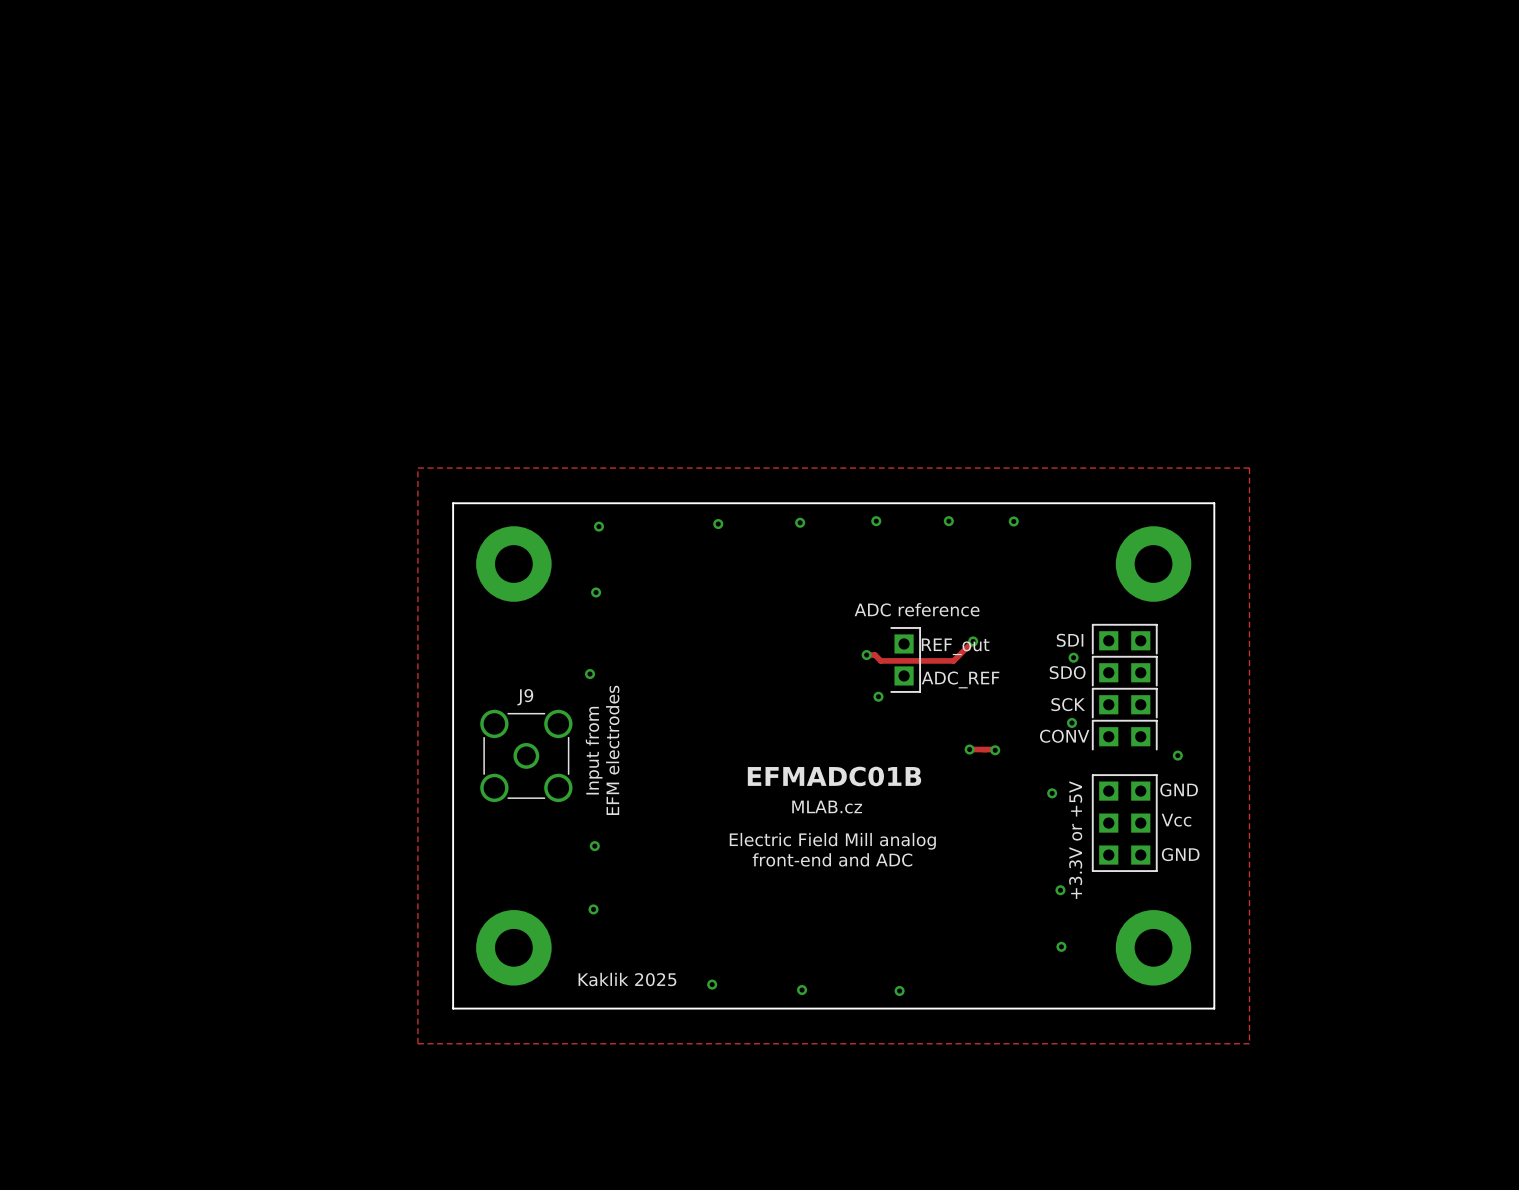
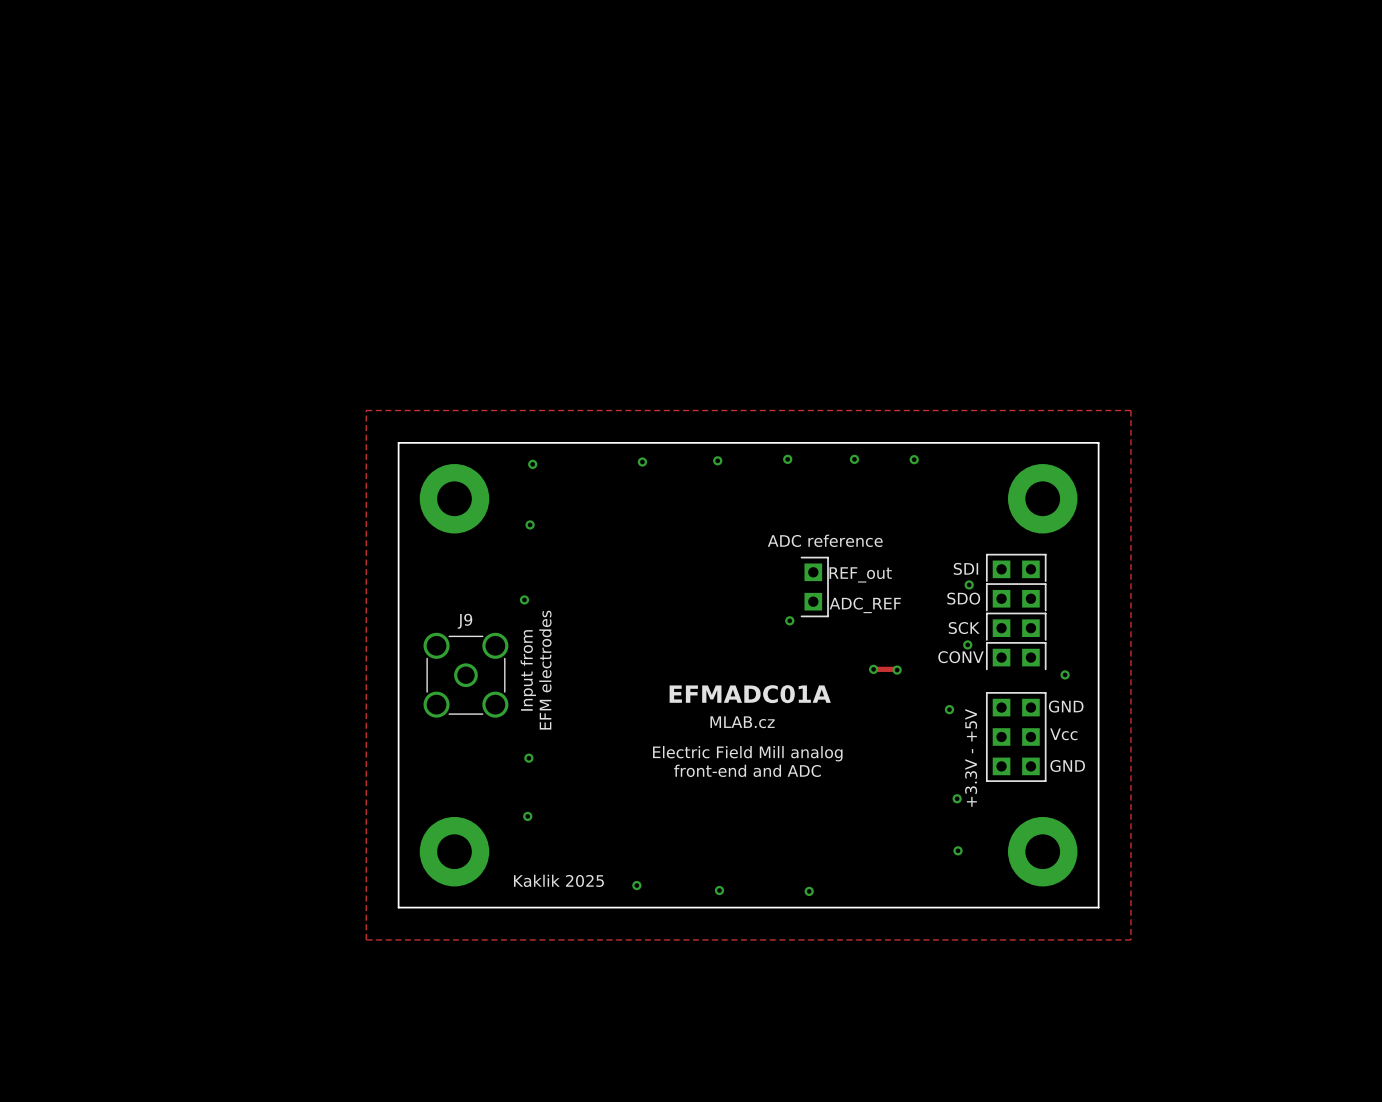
track: (973, 641) (953, 660) (880, 660) (874, 655) (866, 655) -> none
via: (973, 641) -> none
via: (866, 655) -> none
text: EFMADC01B (834, 776) -> EFMADC01A (750, 694)
text: +3.3V or +5V (1075, 840) -> +3.3V - +5V (971, 757)

